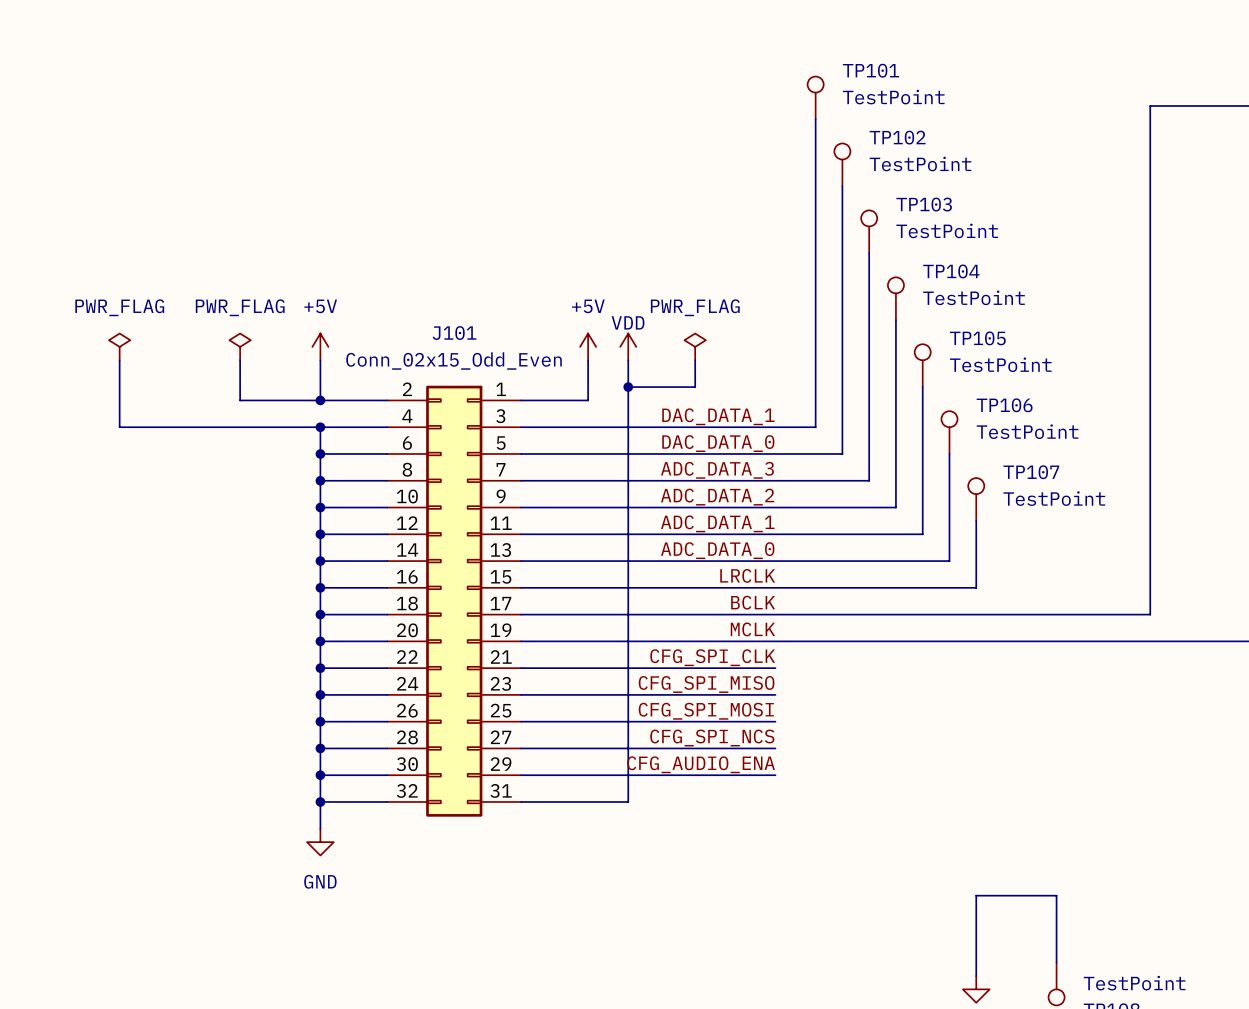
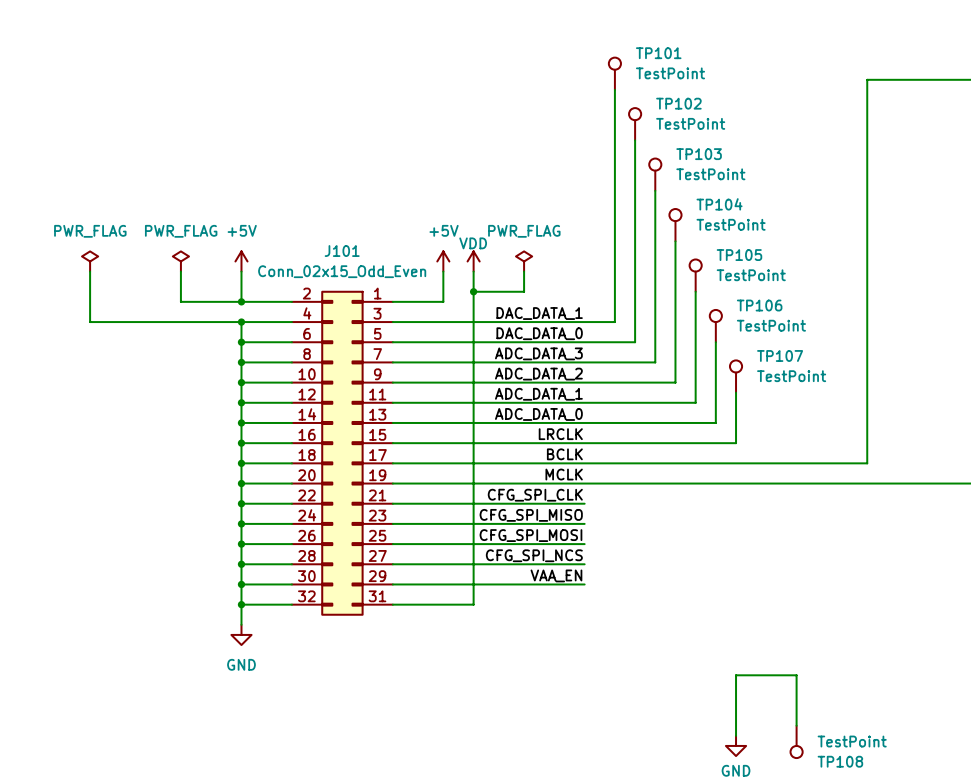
label: CFG_AUDIO_ENA (701, 764) -> VAA_EN (556, 575)

